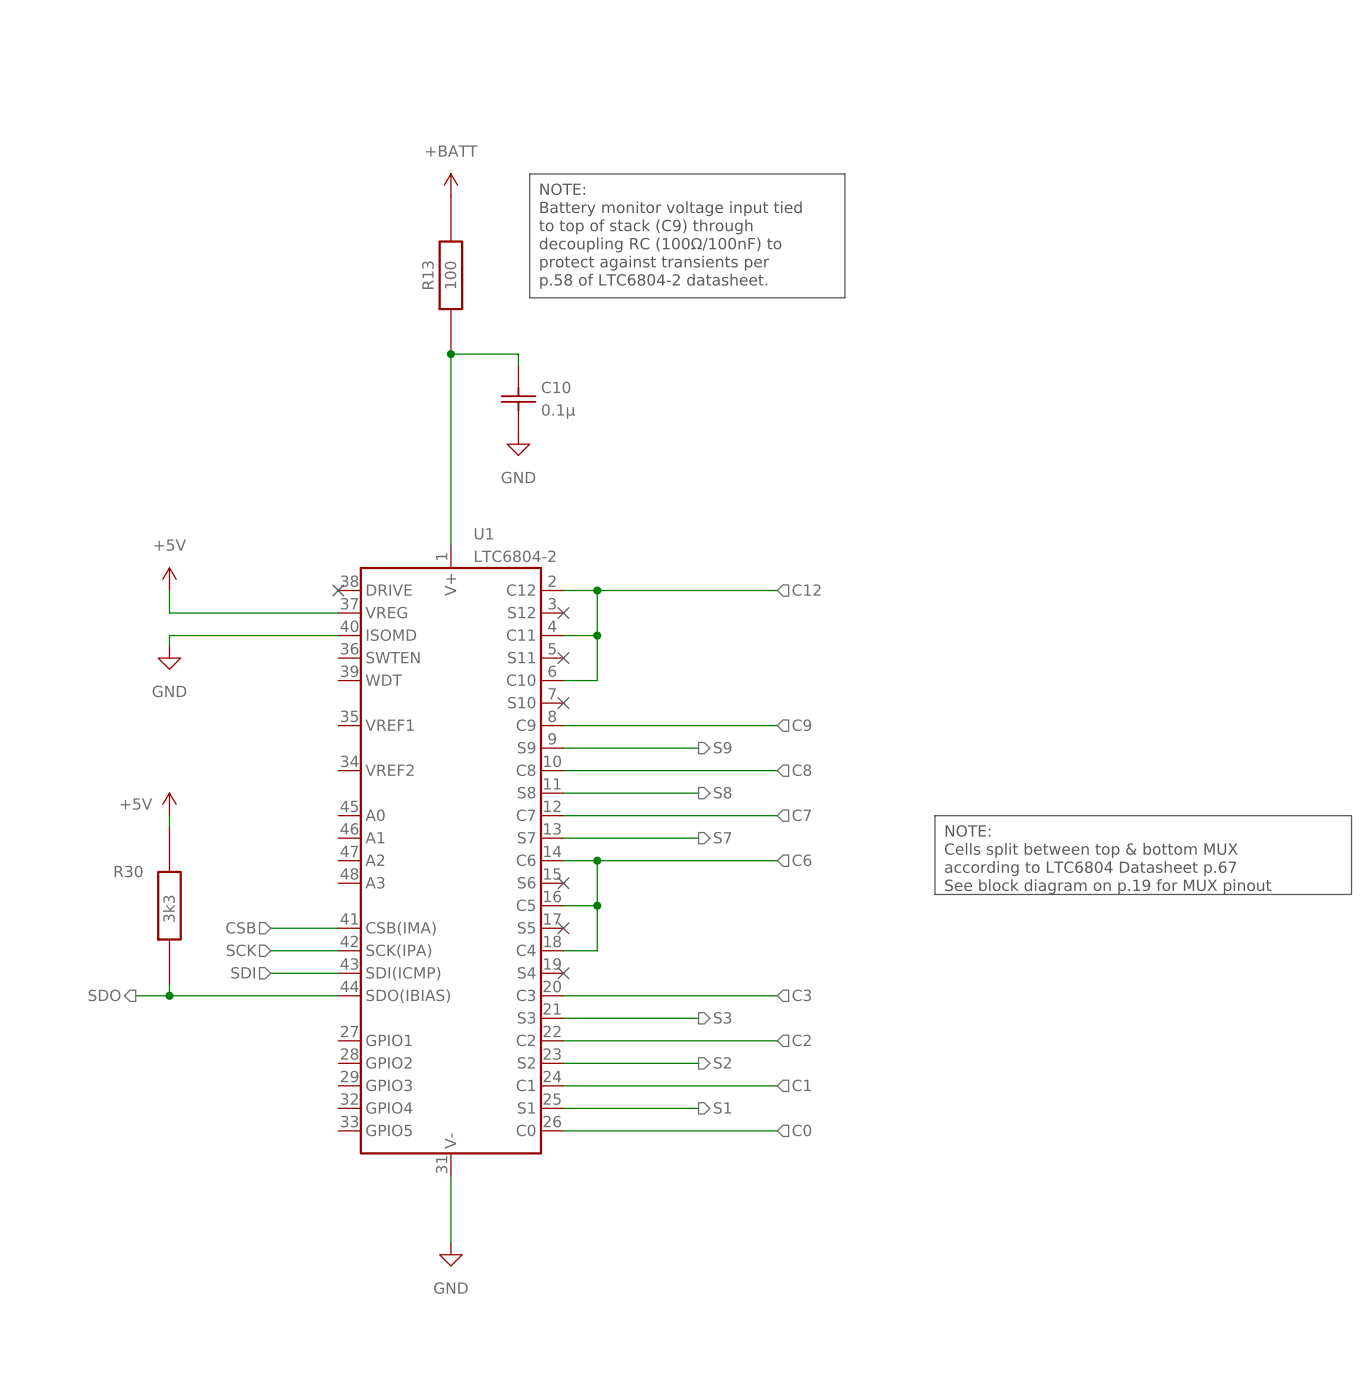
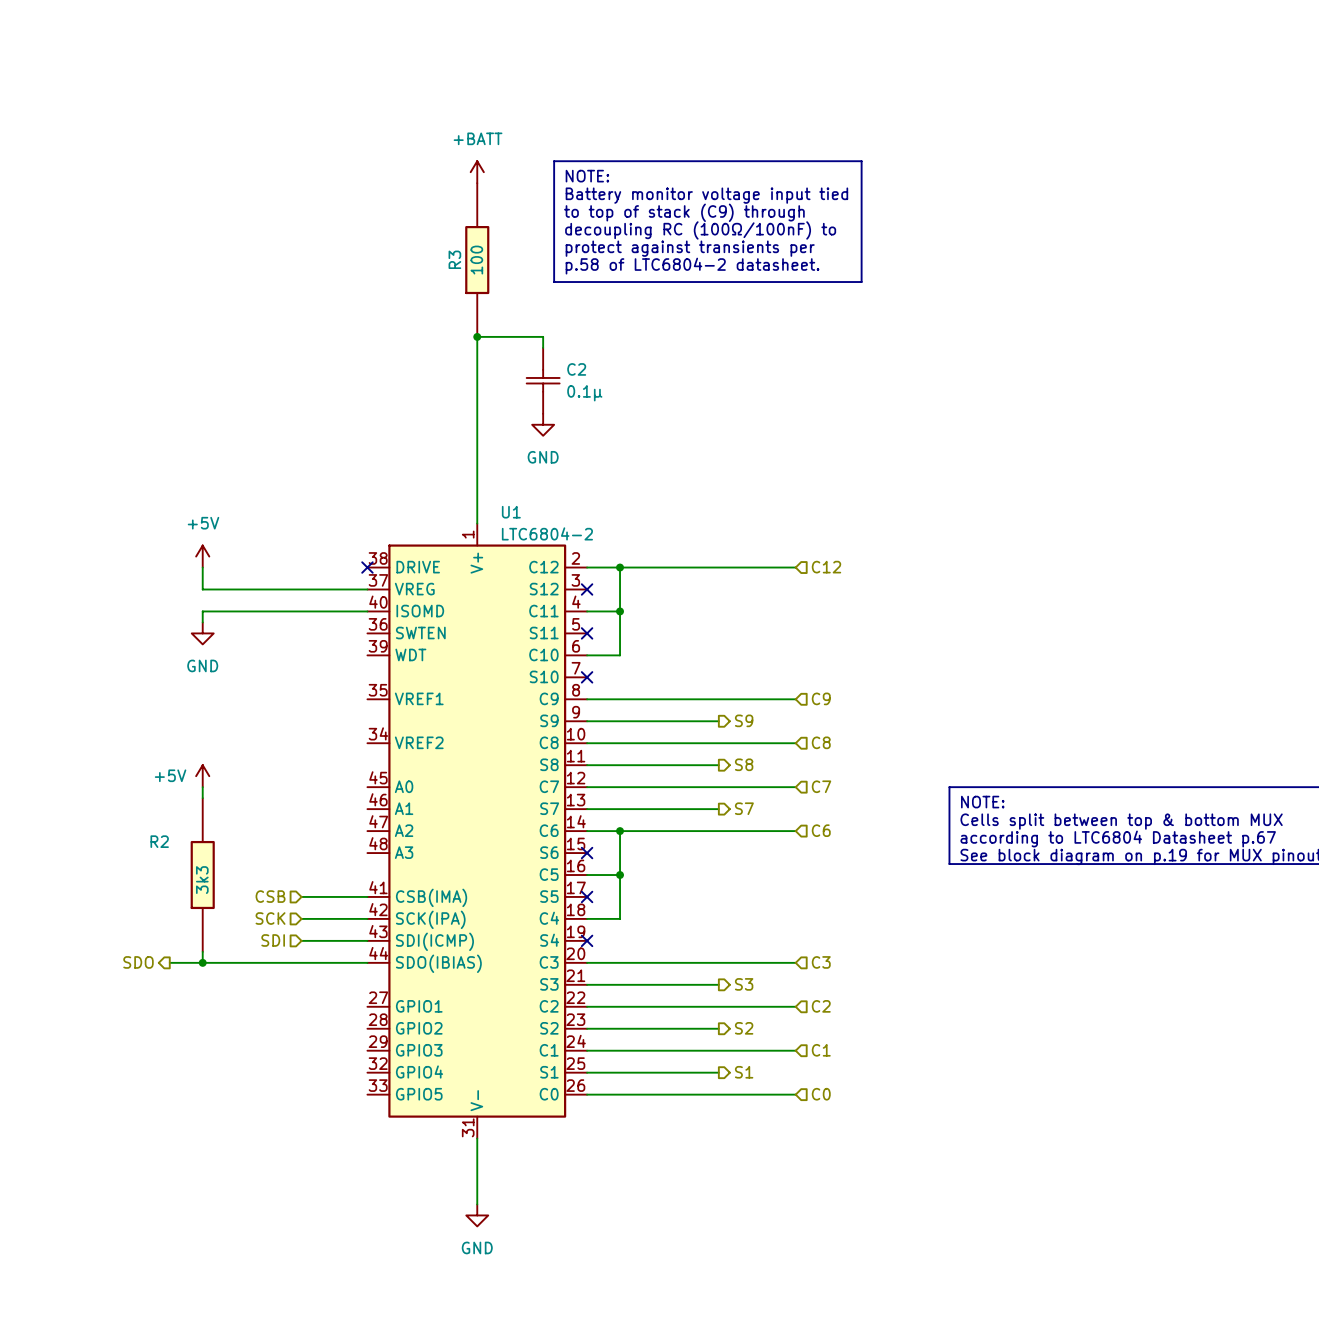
R13 name: R13 (427, 275) -> R3 (454, 259)
C10 name: C10 (556, 387) -> C2 (576, 369)
R30 name: R30 (128, 871) -> R2 (159, 841)

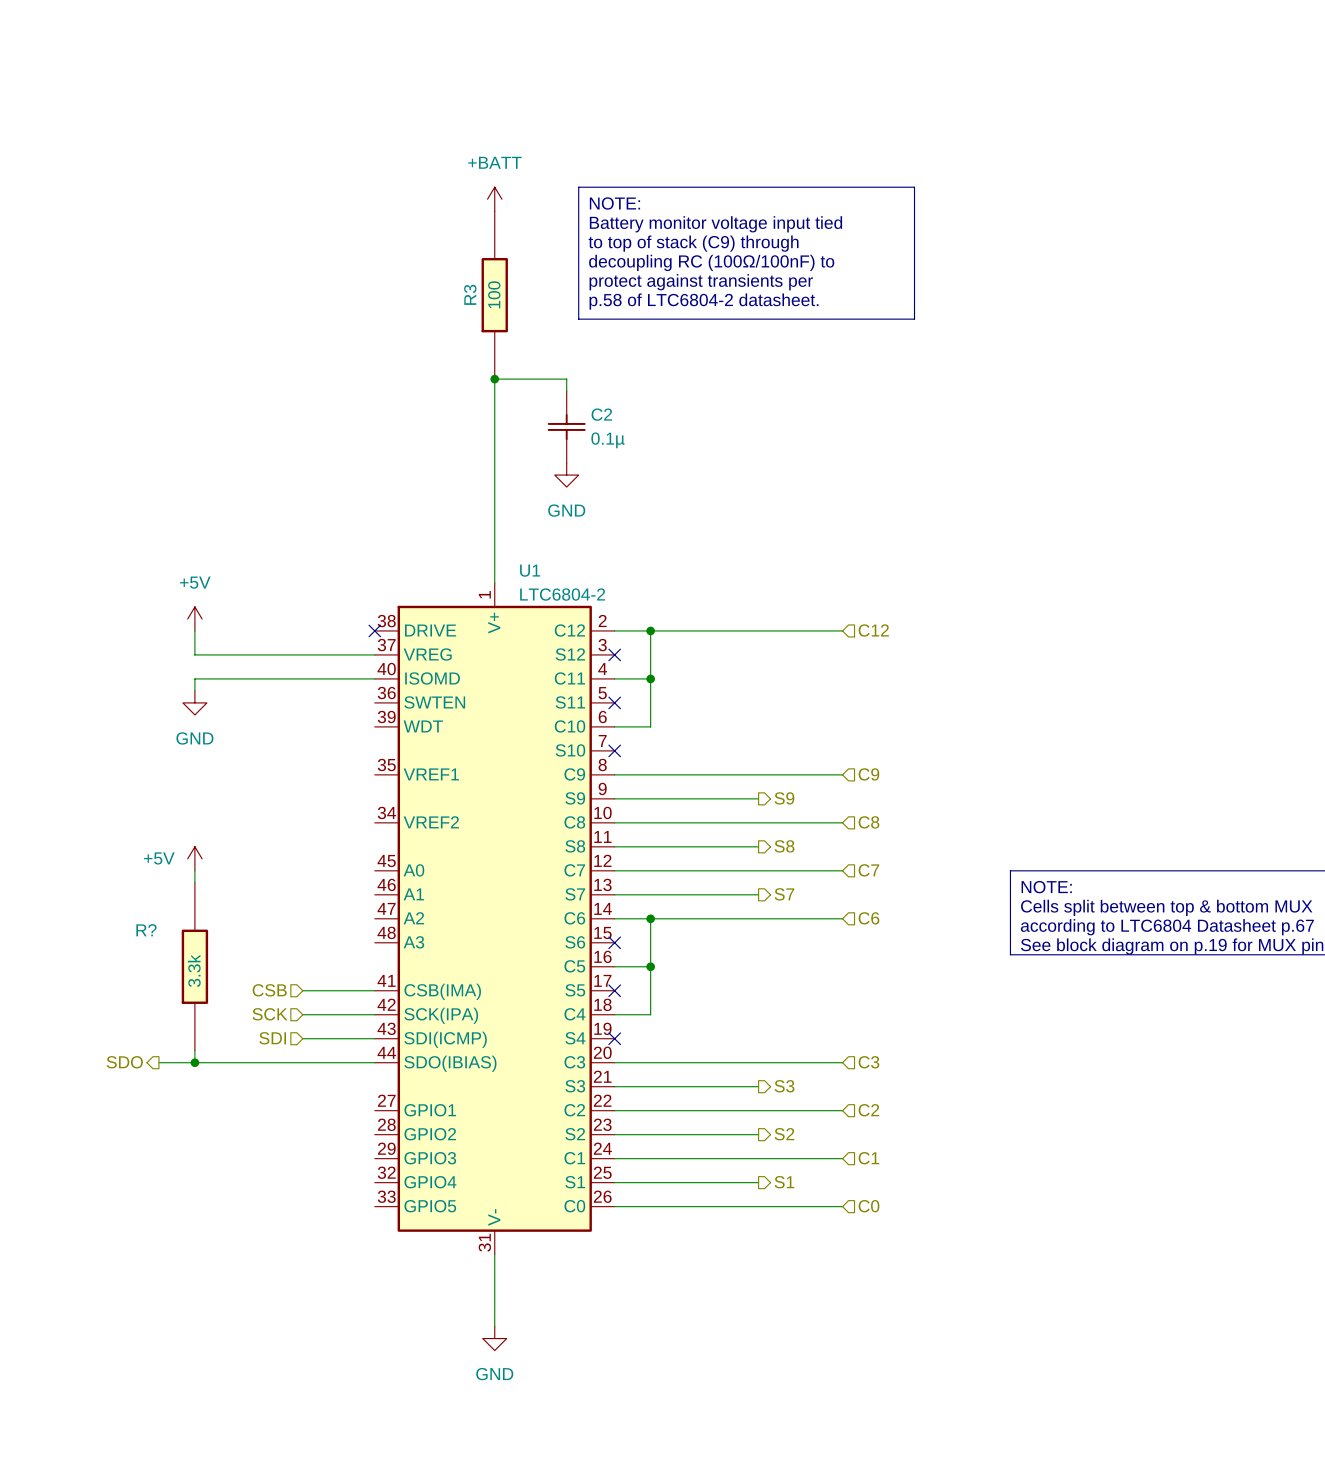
R2 name: R2 (159, 841) -> R? (146, 930)
R2 value: 3k3 (202, 880) -> 3.3k (194, 970)

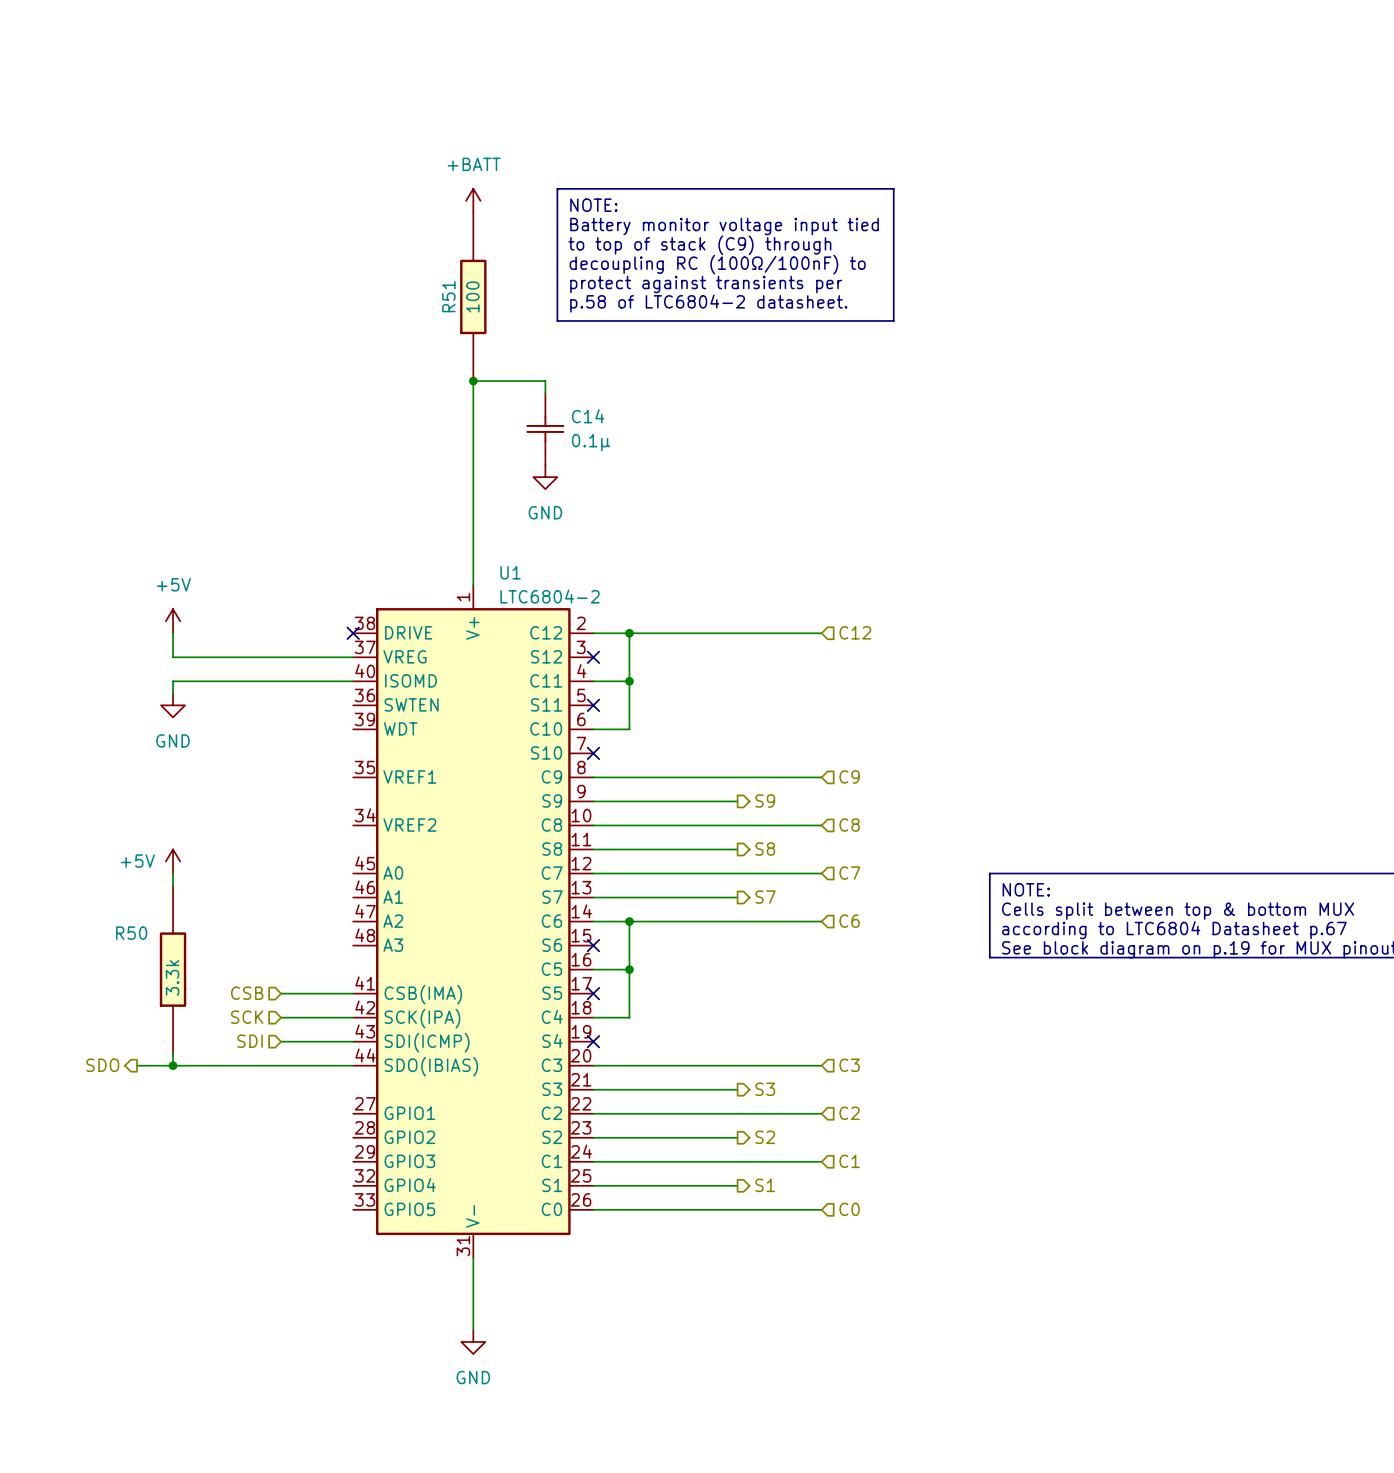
R3 name: R3 (470, 294) -> R51 (448, 296)
C2 name: C2 (601, 414) -> C14 (588, 416)
R? name: R? (146, 930) -> R50 (131, 933)

